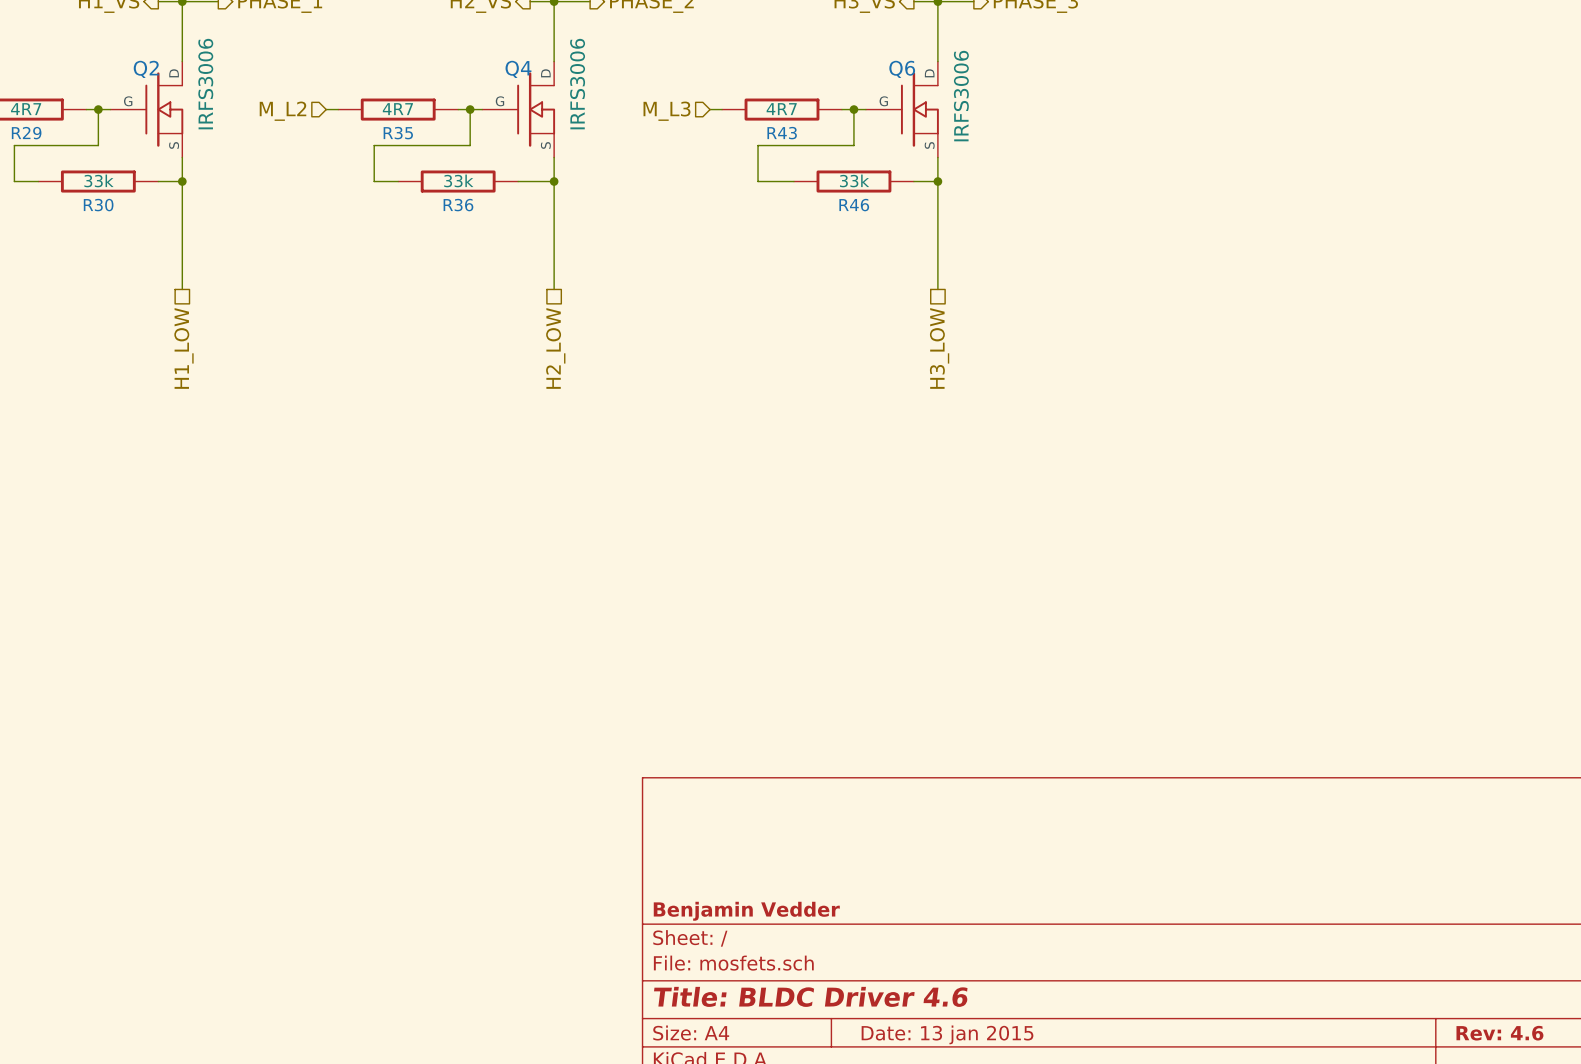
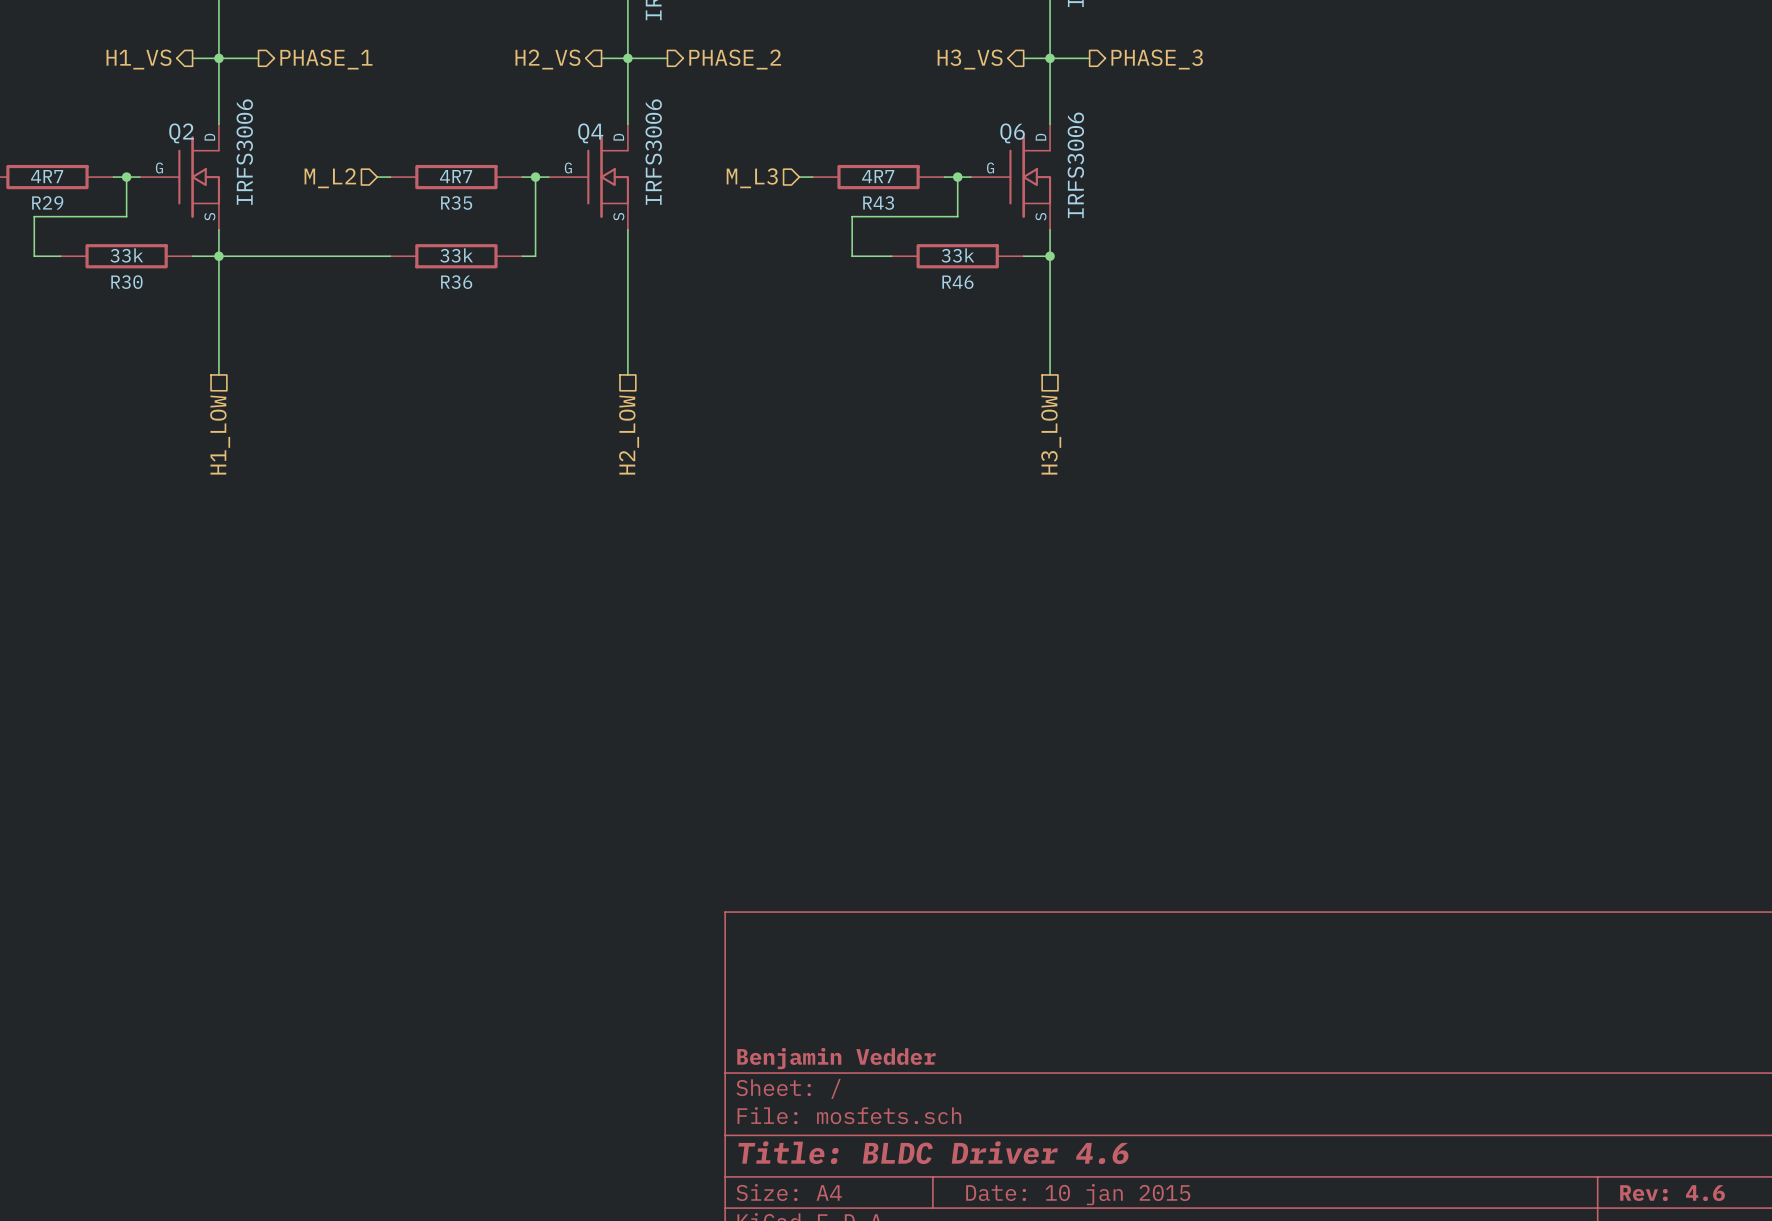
wire: (470, 145) (374, 145) (374, 181) (398, 181) -> (535, 216) (535, 256) (522, 256)
wire: none -> (218, 256) (390, 256)
R36 position: (458, 181) -> (456, 256)
wire: (518, 181) (554, 181) -> none
junction: (554, 181) -> none
title block: Date: 13 jan 2015 (947, 1034) -> Date: 10 jan 2015 (1078, 1194)

